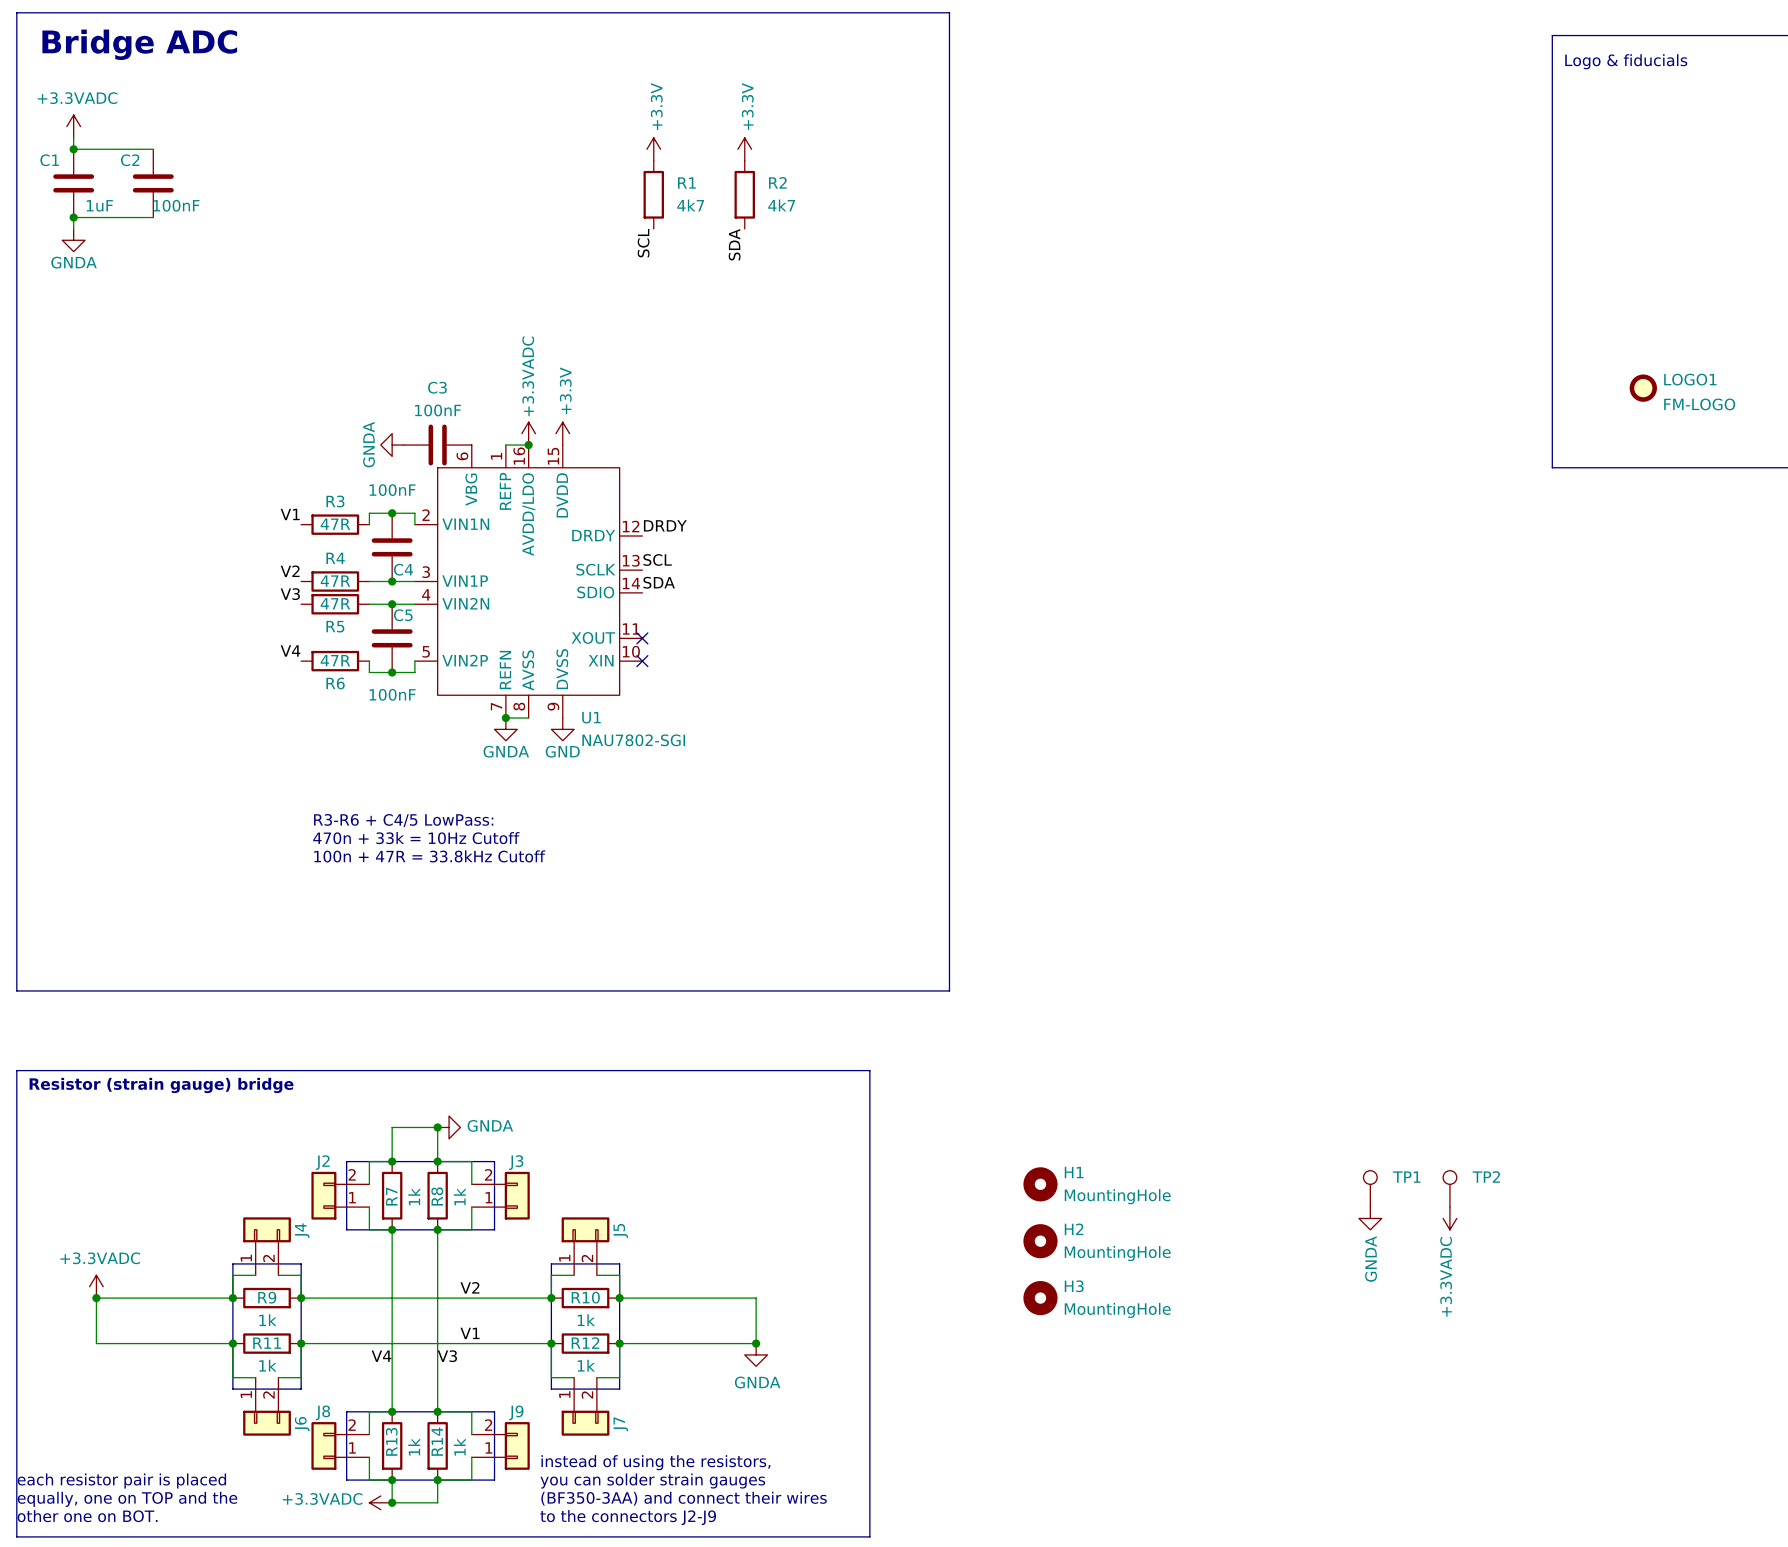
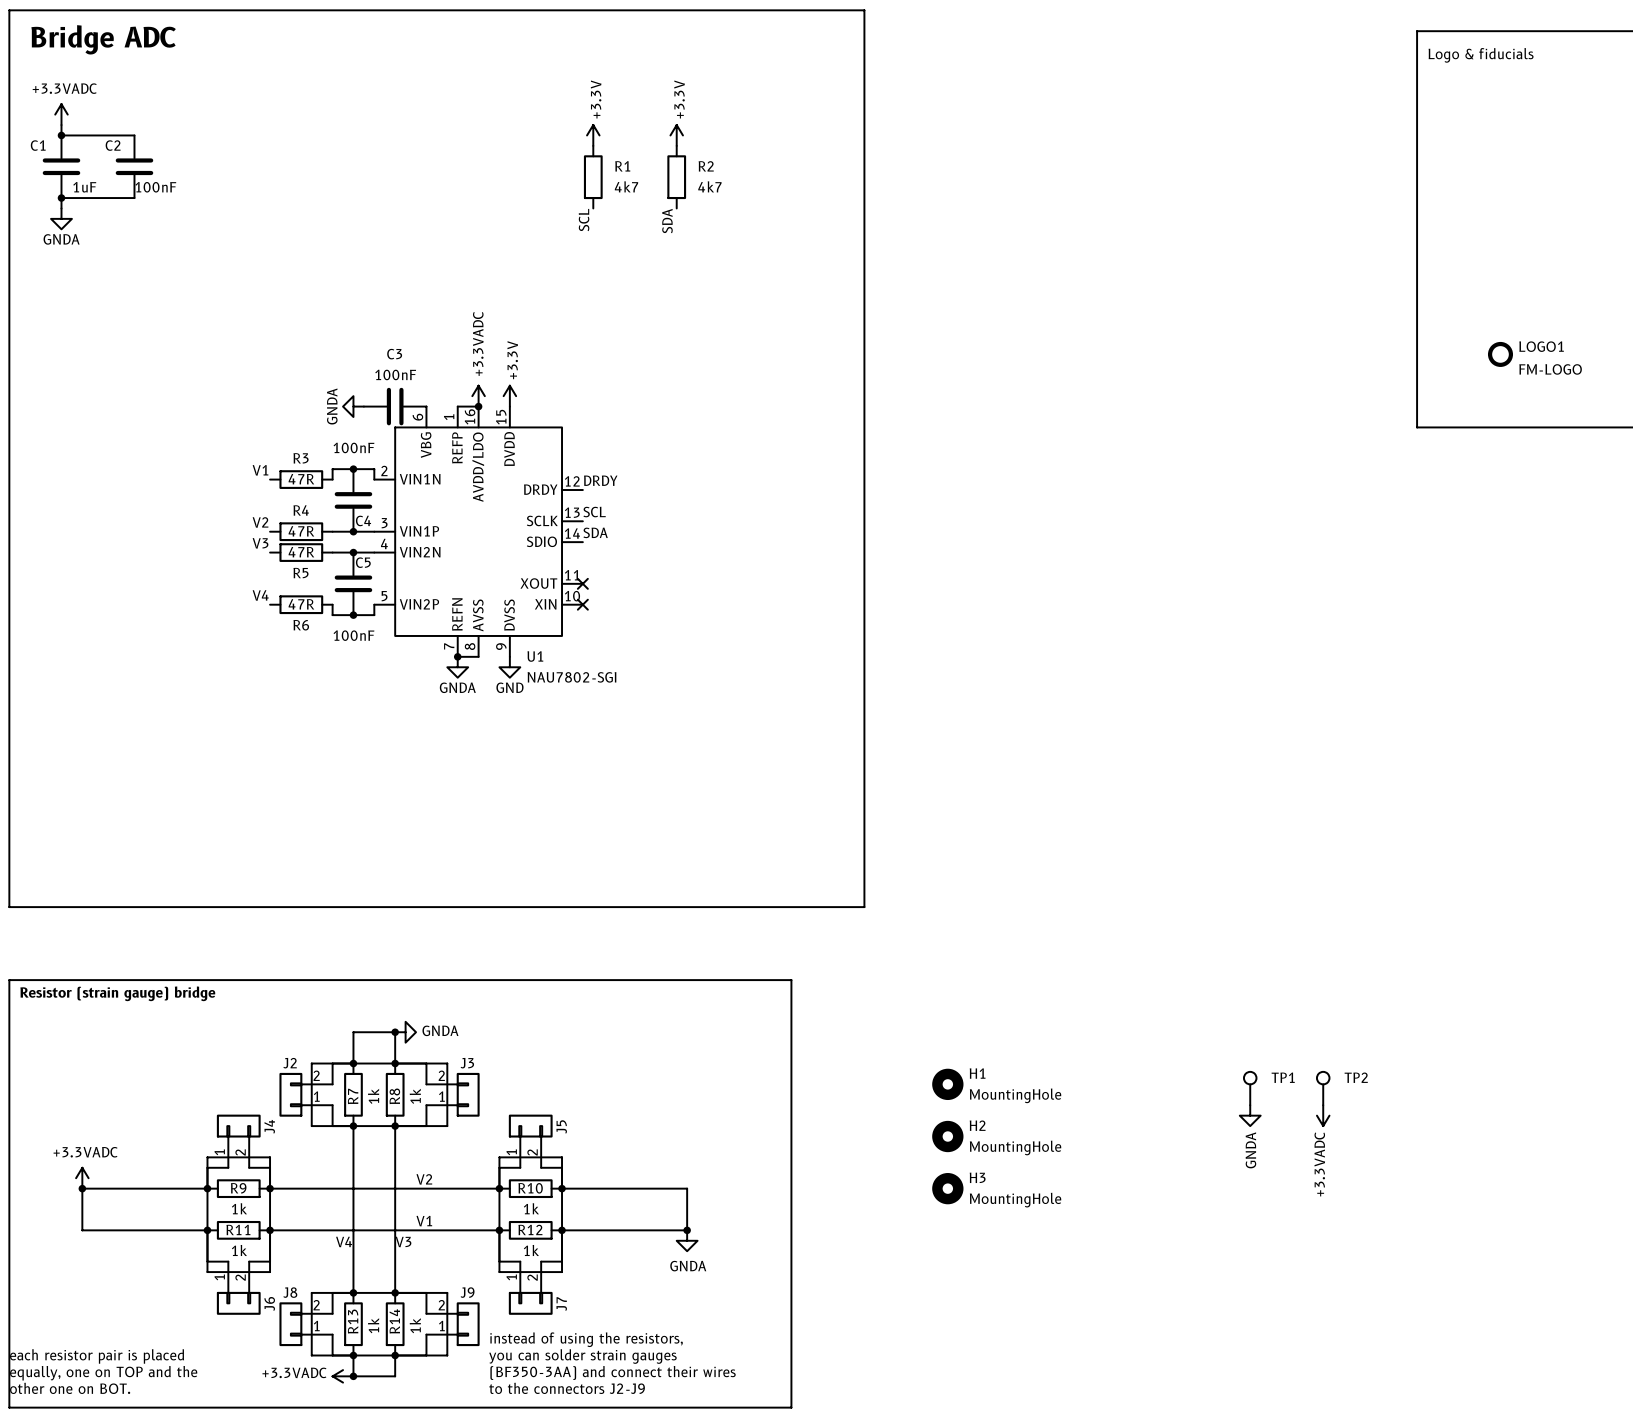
text: R3-R6 + C4/5 LowPass: (403, 820) -> none
text: 470n + 33k = 10Hz Cutoff (416, 838) -> none
text: 100n + 47R = 33.8kHz Cutoff (429, 856) -> none

